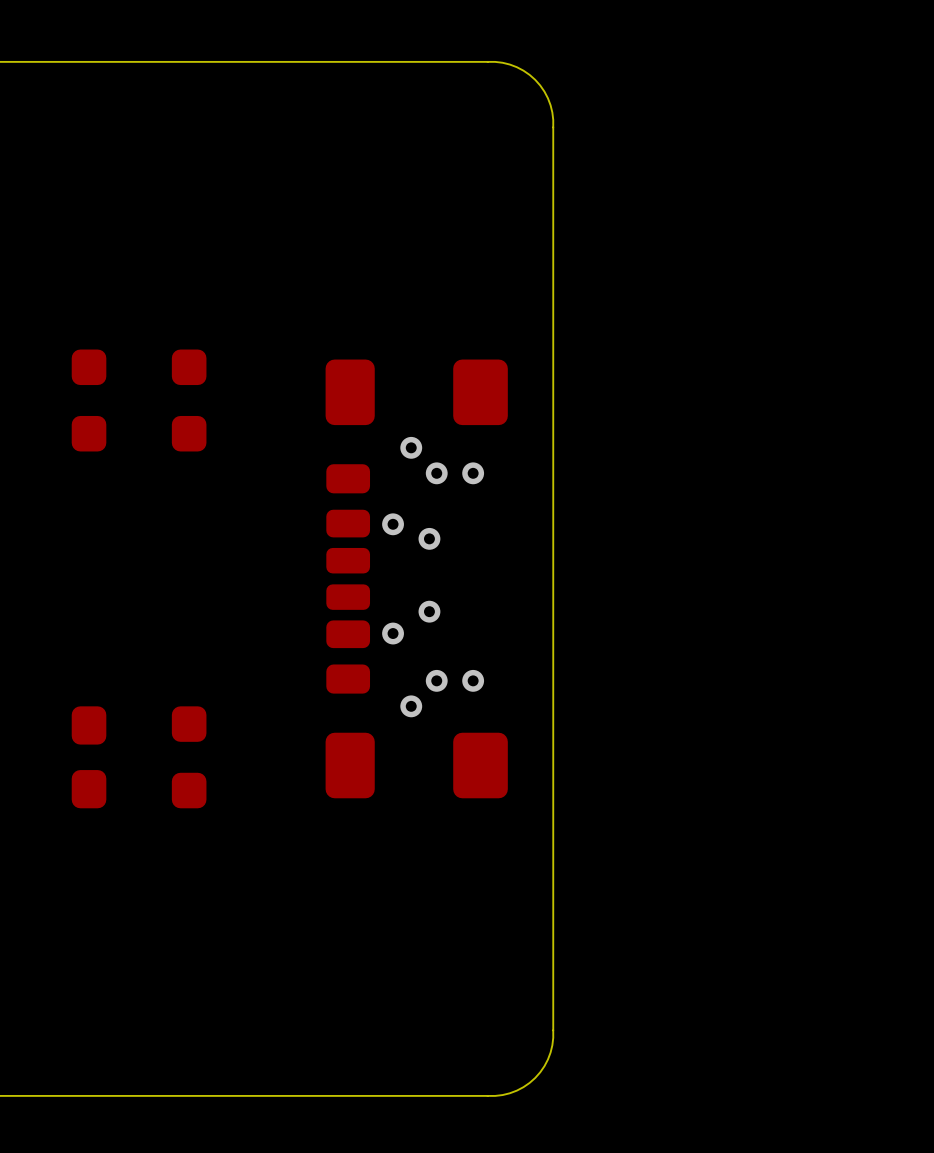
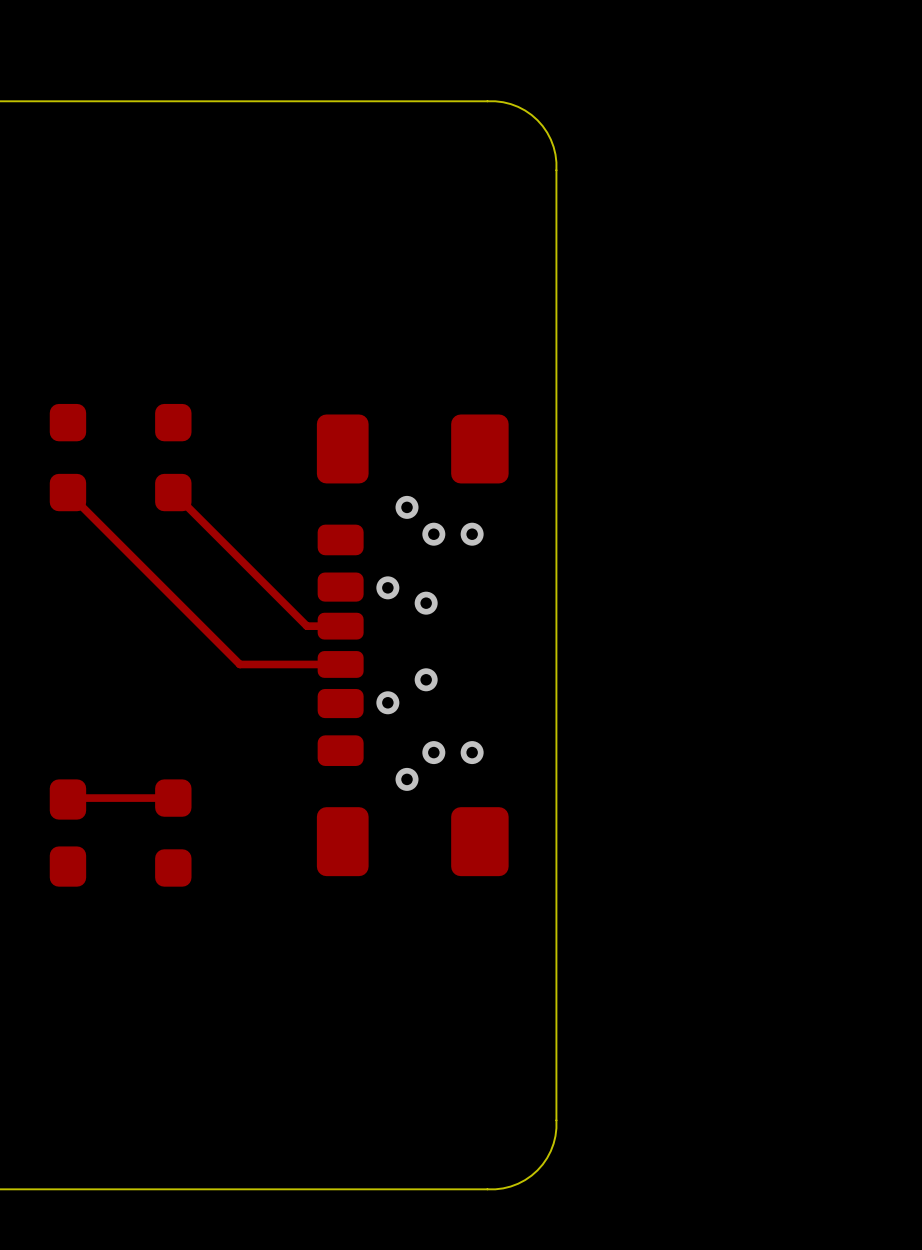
top track: none -> (67, 492) (239, 664) (340, 664)
top track: none -> (173, 492) (306, 626) (340, 626)
top track: none -> (173, 798) (67, 799)

